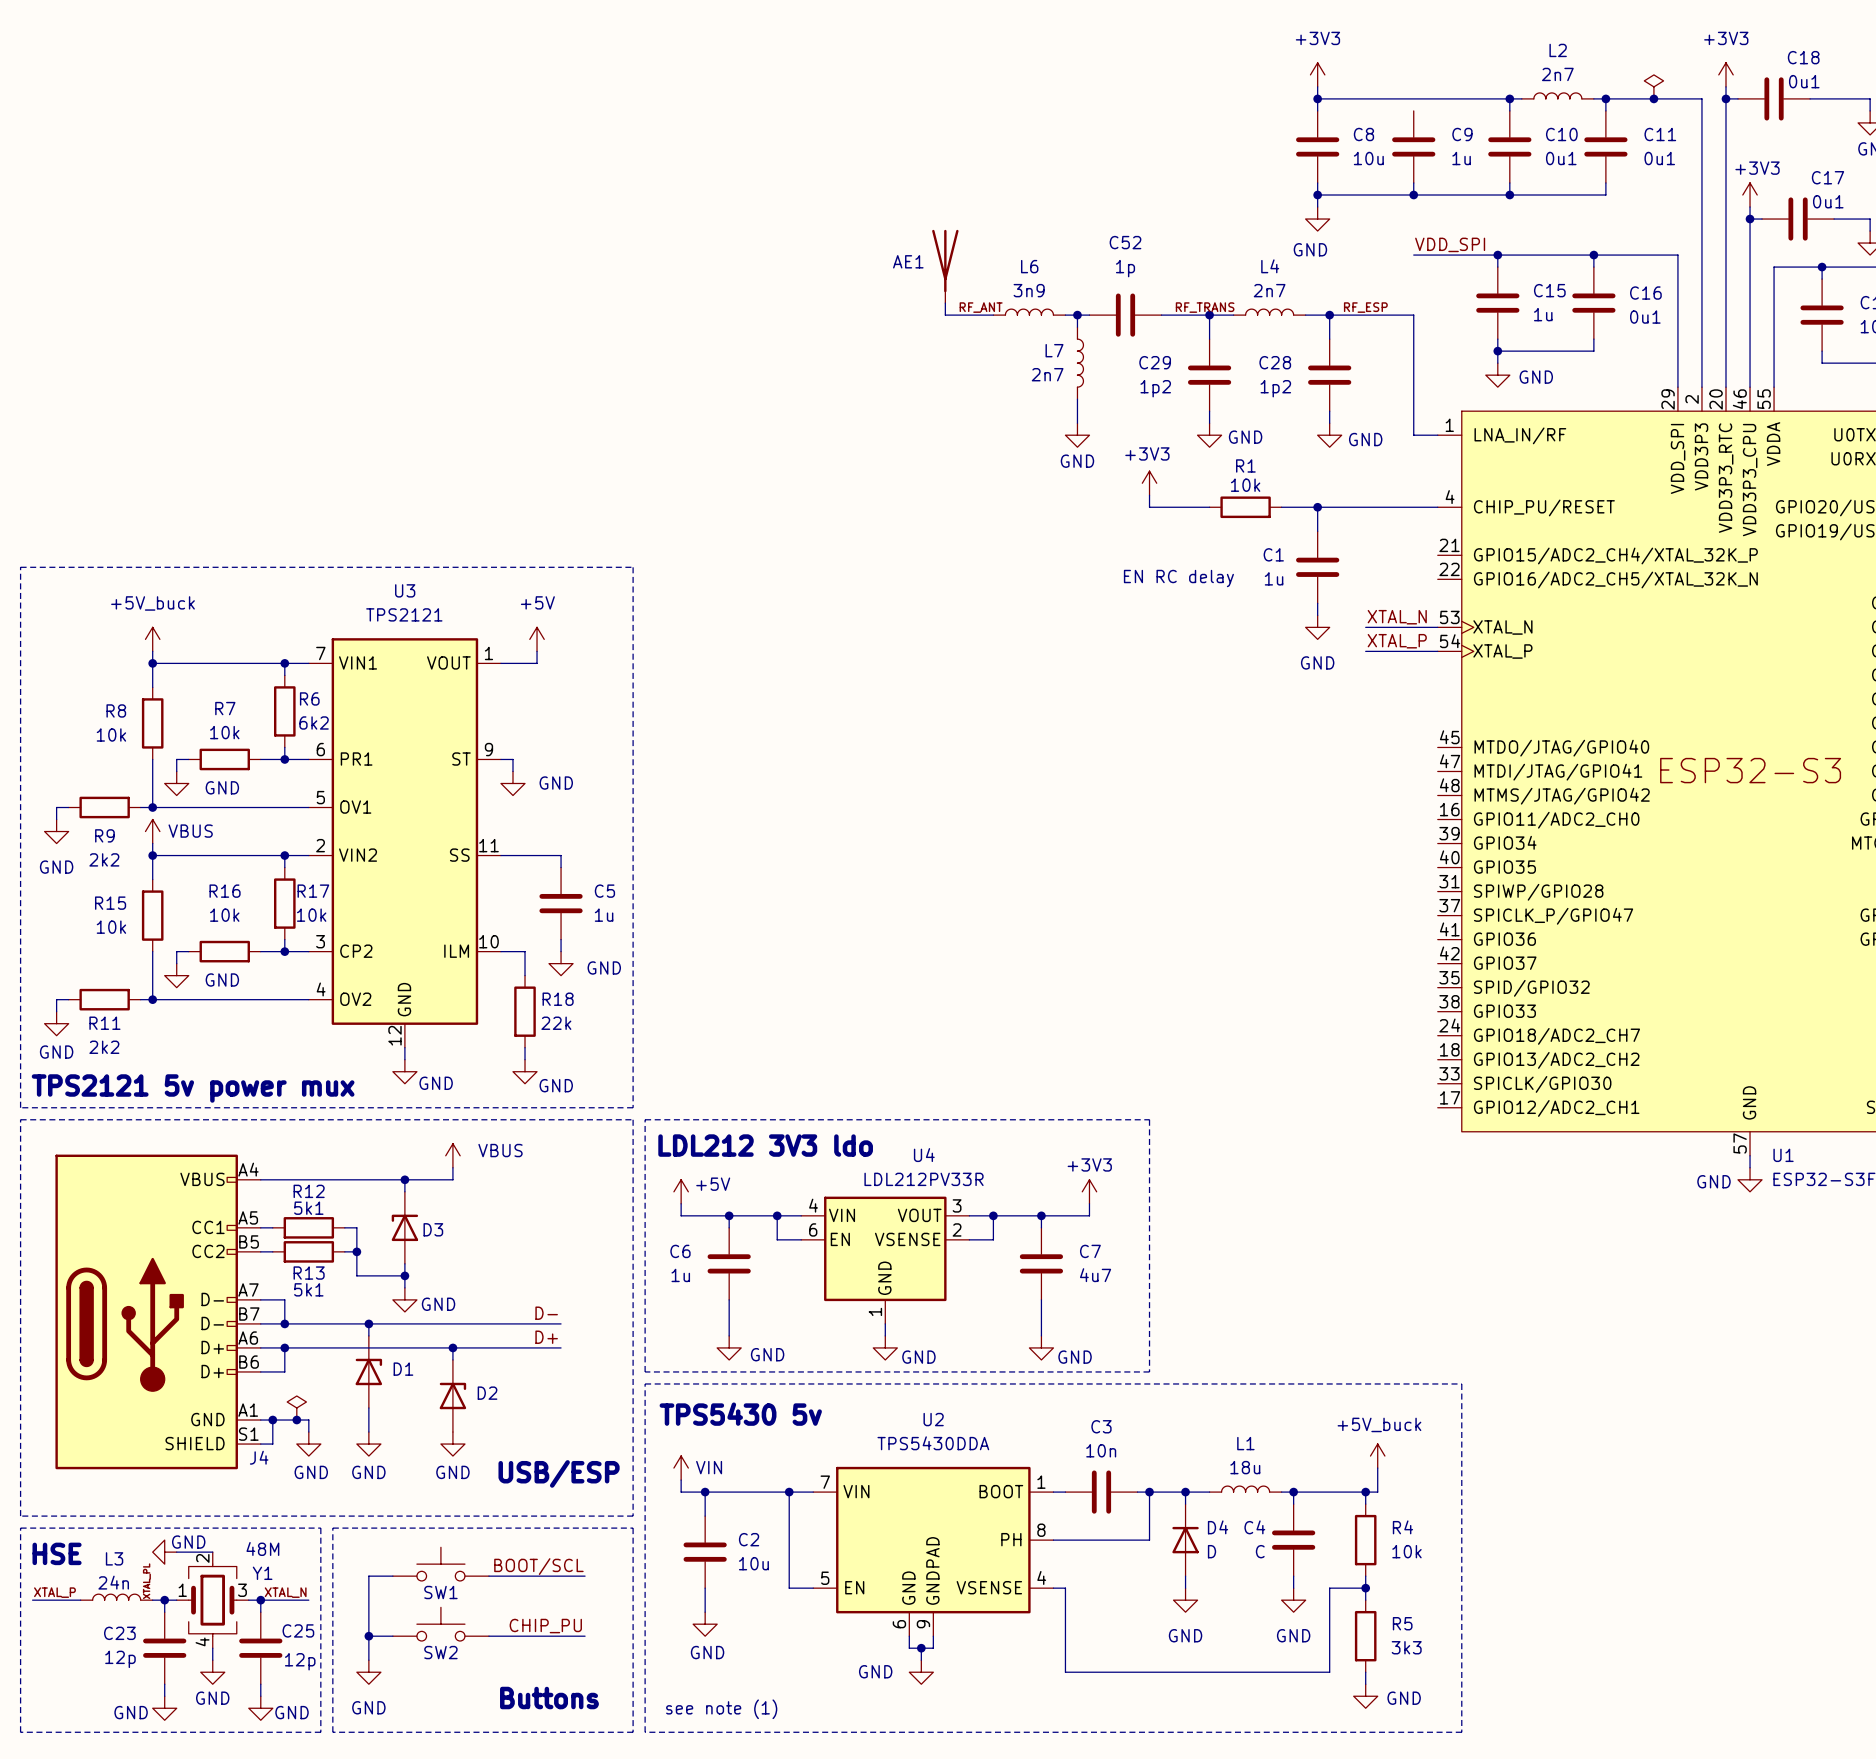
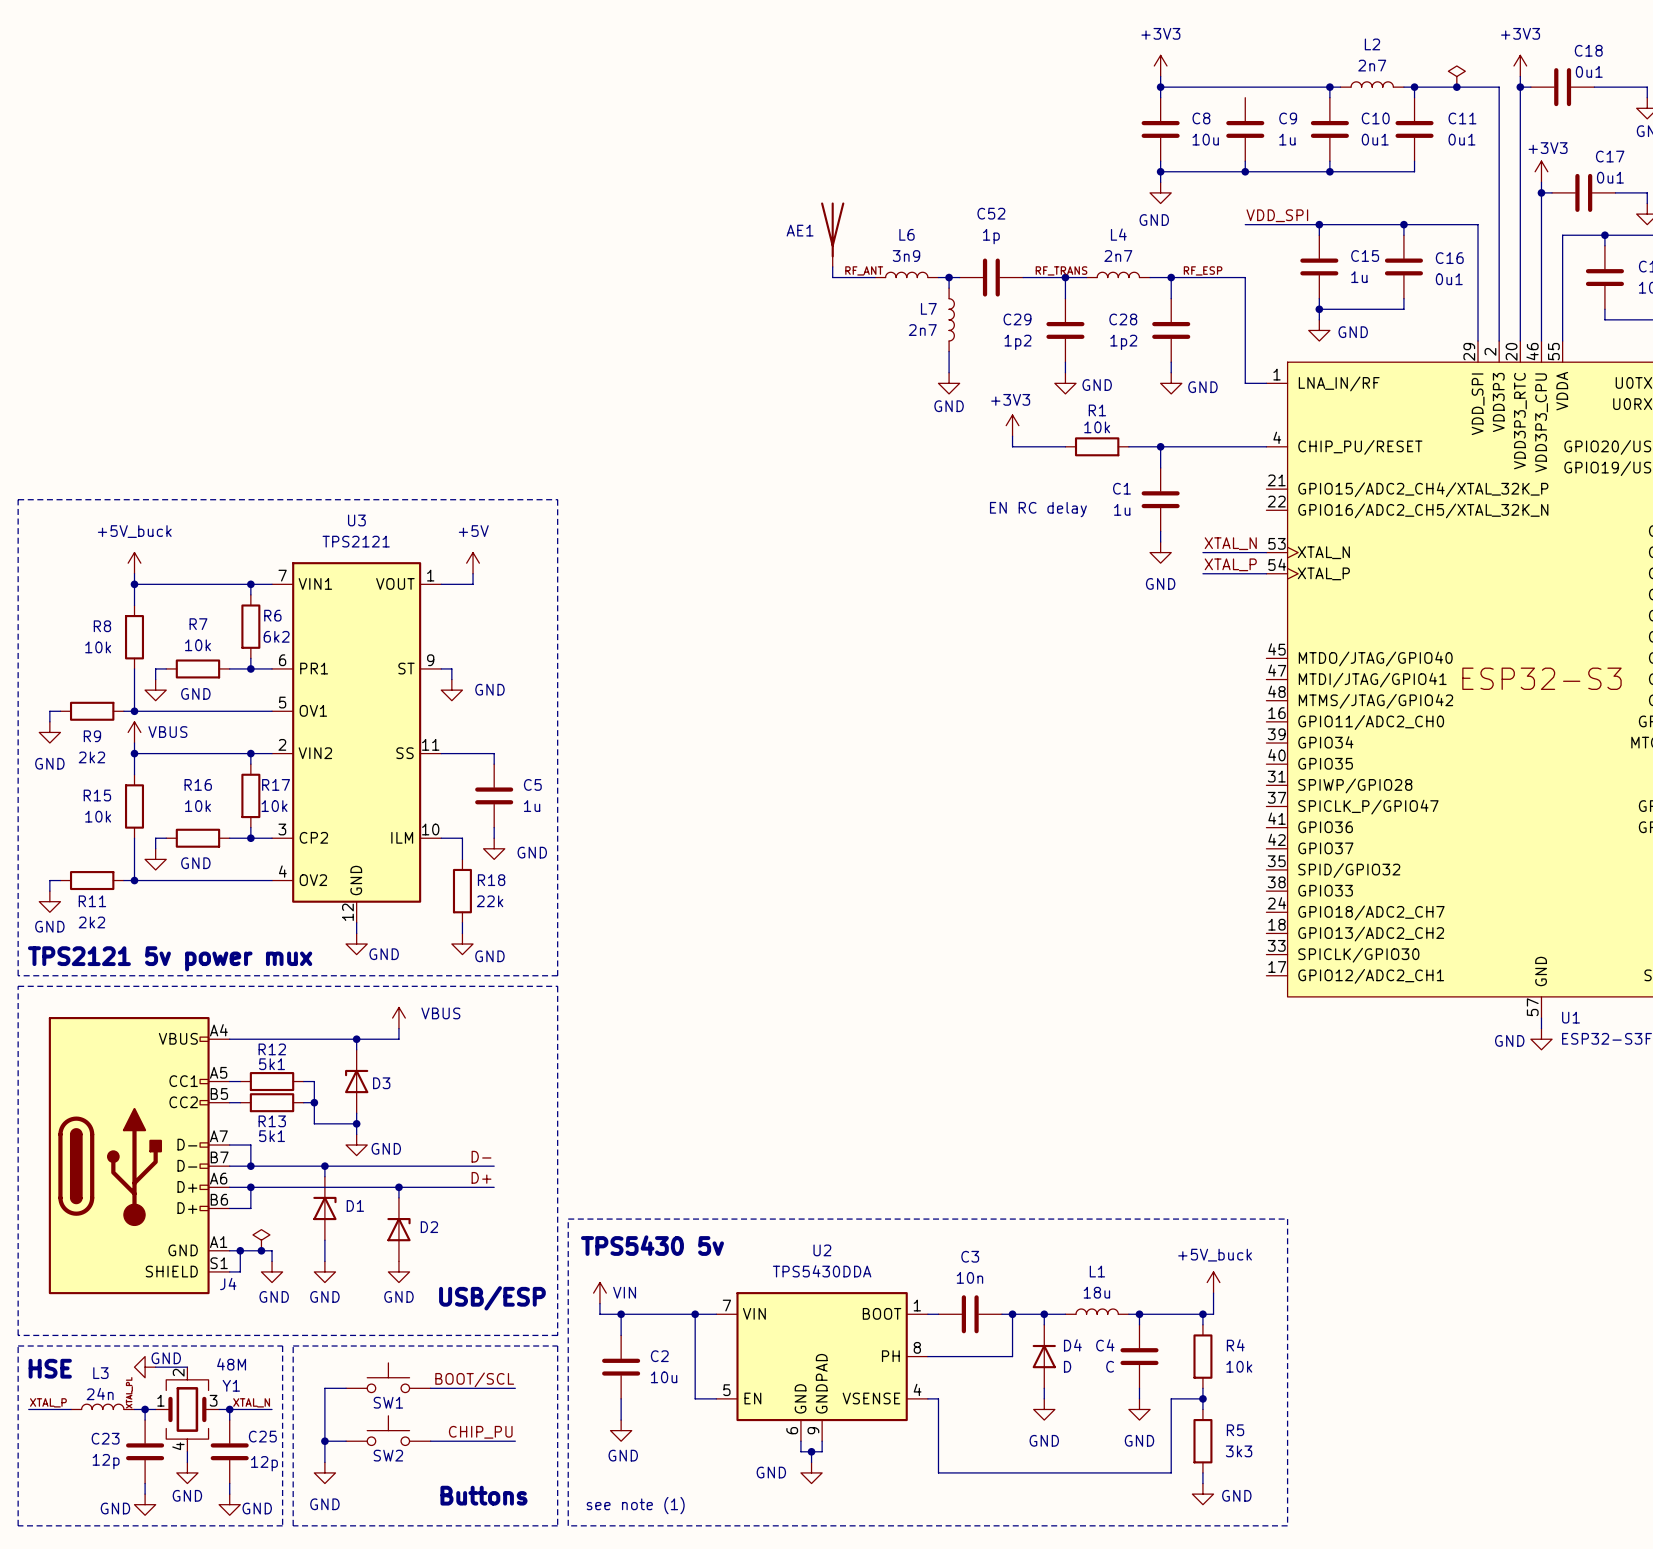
line: (645, 1119) (1149, 1119) (1149, 1371) (645, 1371) (645, 1119) -> none
text: LDL212 3V3 ldo (765, 1145) -> none
power symbol: +5V (681, 1191) -> none
power symbol: +3V3 (1089, 1191) -> none
wire: (681, 1203) (681, 1215) (801, 1215) -> none
wire: (1089, 1203) (1089, 1215) (969, 1215) -> none
wire: (729, 1215) (729, 1227) -> none
junction: (729, 1215) -> none
wire: (777, 1215) (777, 1239) (801, 1239) -> none
junction: (777, 1215) -> none
wire: (993, 1215) (993, 1239) (969, 1239) -> none
junction: (993, 1215) -> none
wire: (1041, 1215) (1041, 1227) -> none
junction: (1041, 1215) -> none
U4: LDL212PV33R (885, 1260) -> none
C6: 1u (729, 1263) -> none
C7: 4u7 (1041, 1263) -> none
wire: (729, 1299) (729, 1335) -> none
wire: (1041, 1299) (1041, 1335) -> none
wire: (885, 1323) (885, 1335) -> none
power symbol: GND (729, 1347) -> none
power symbol: GND (885, 1347) -> none
power symbol: GND (1041, 1347) -> none

